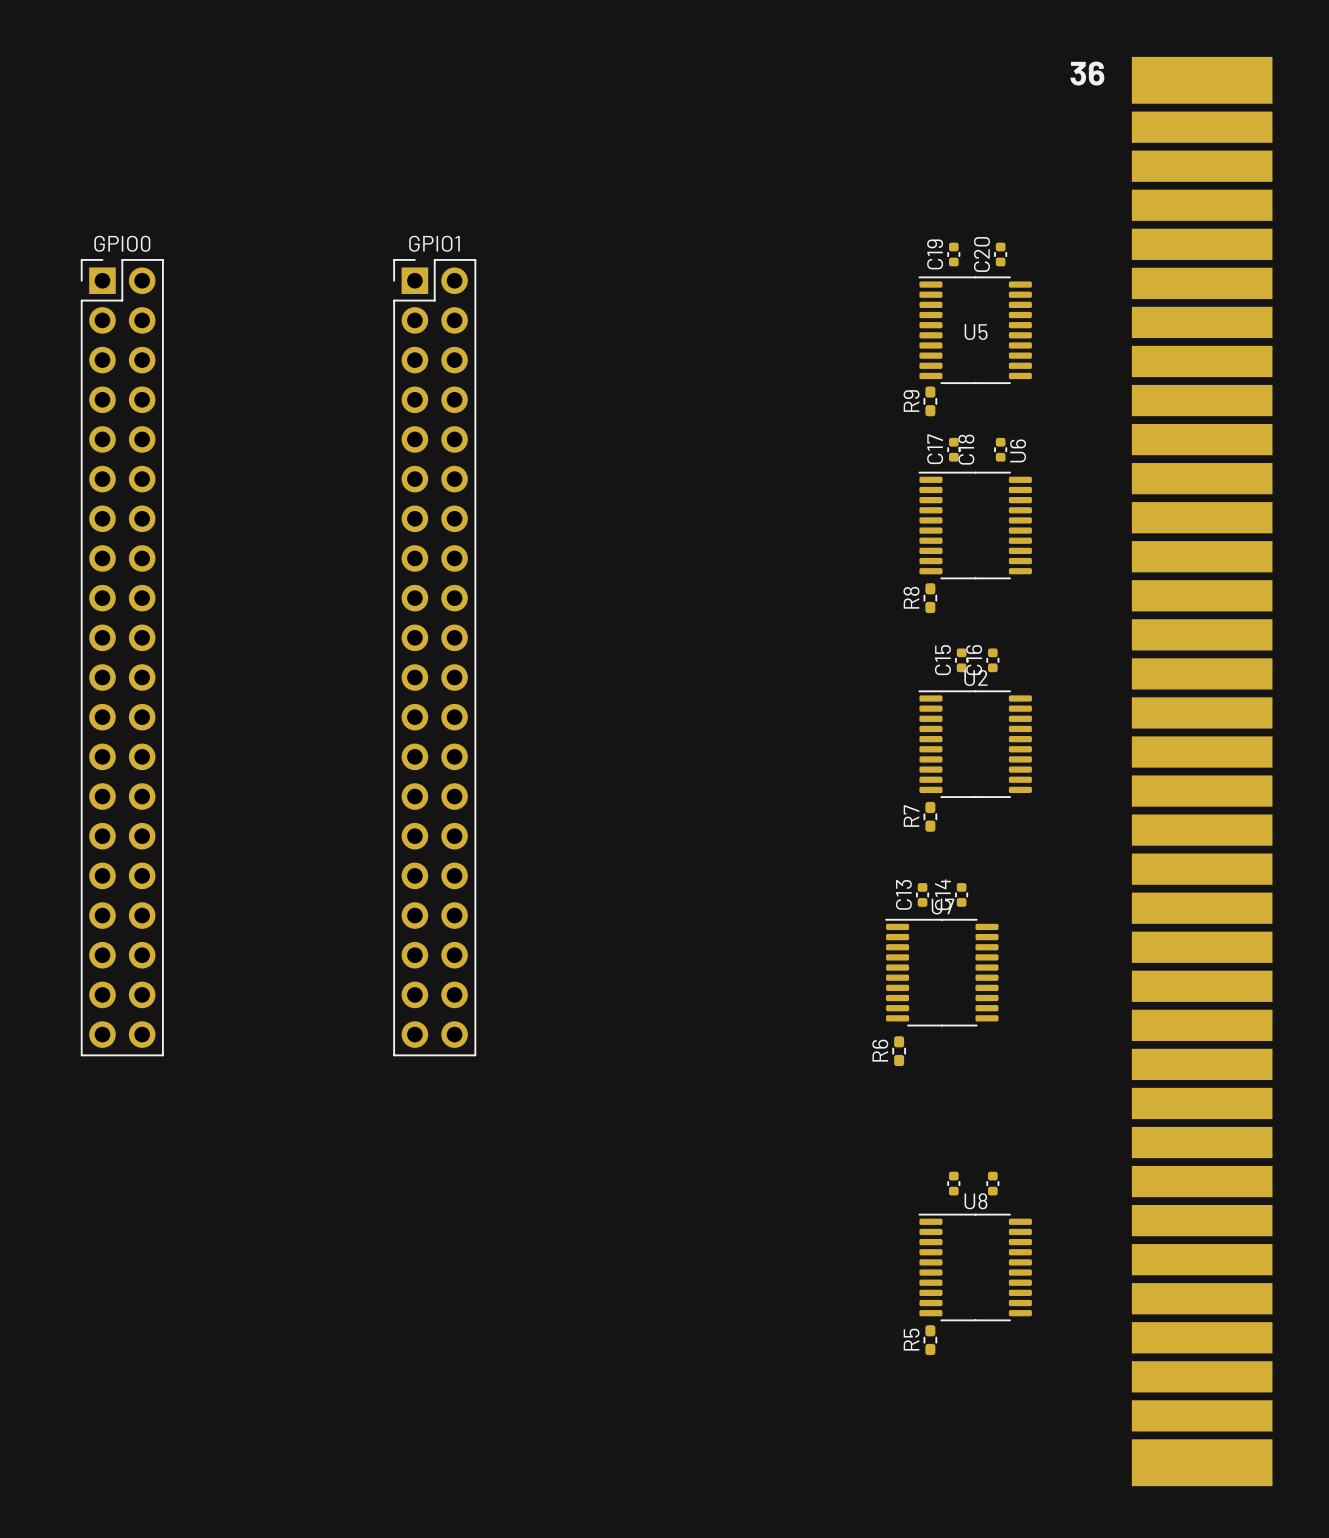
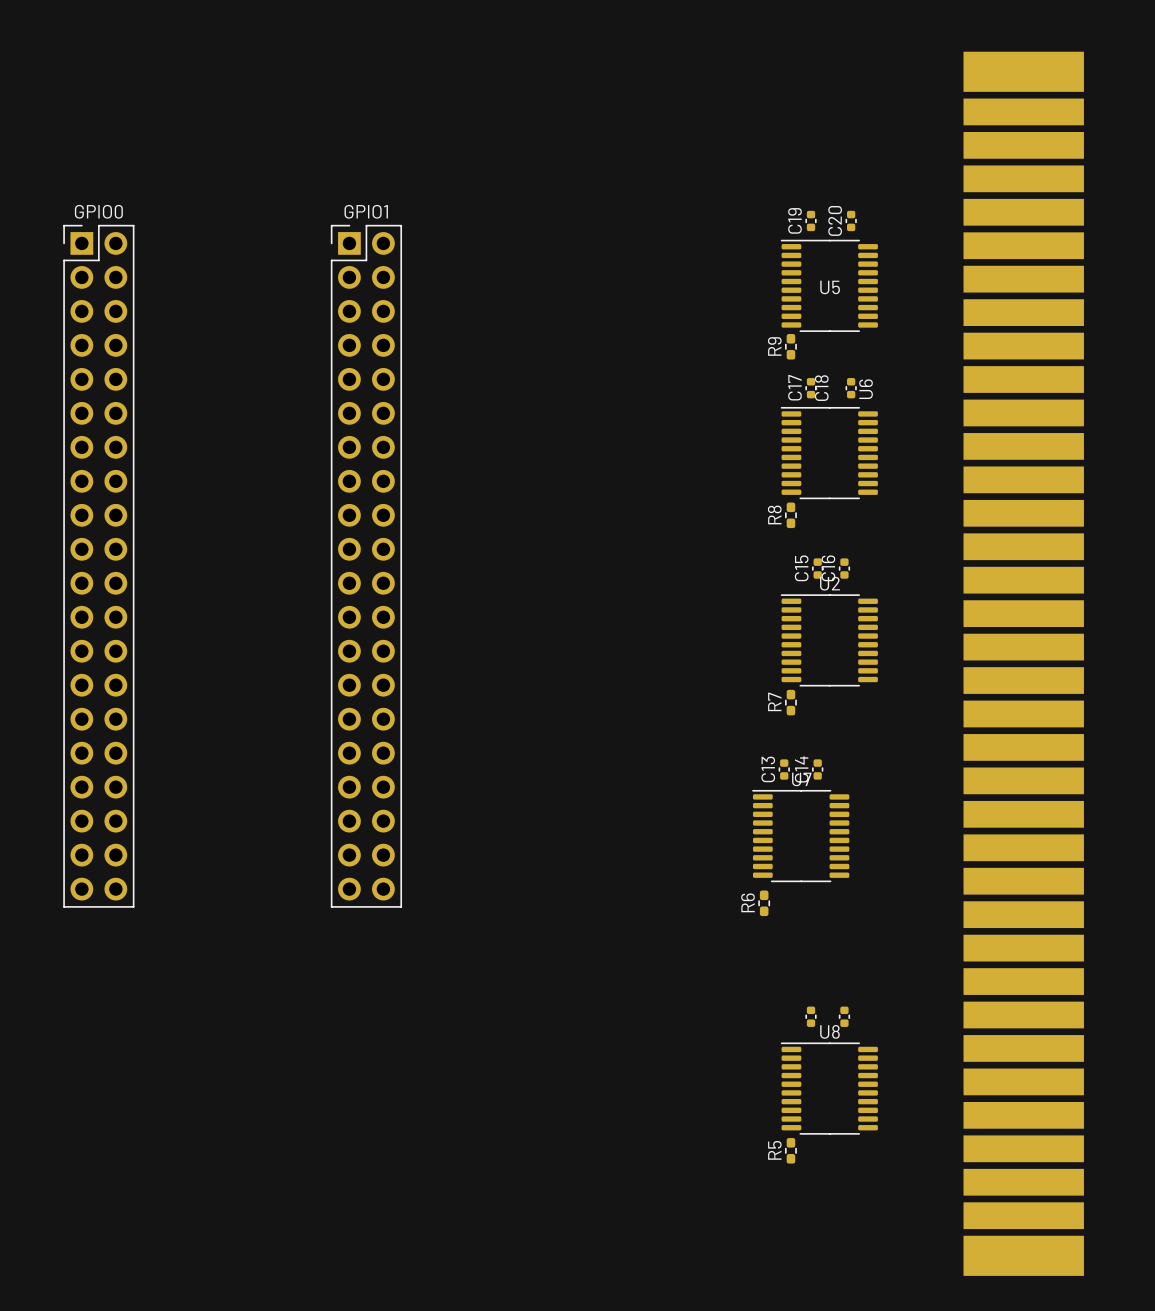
text: 36 (1087, 73) -> none

